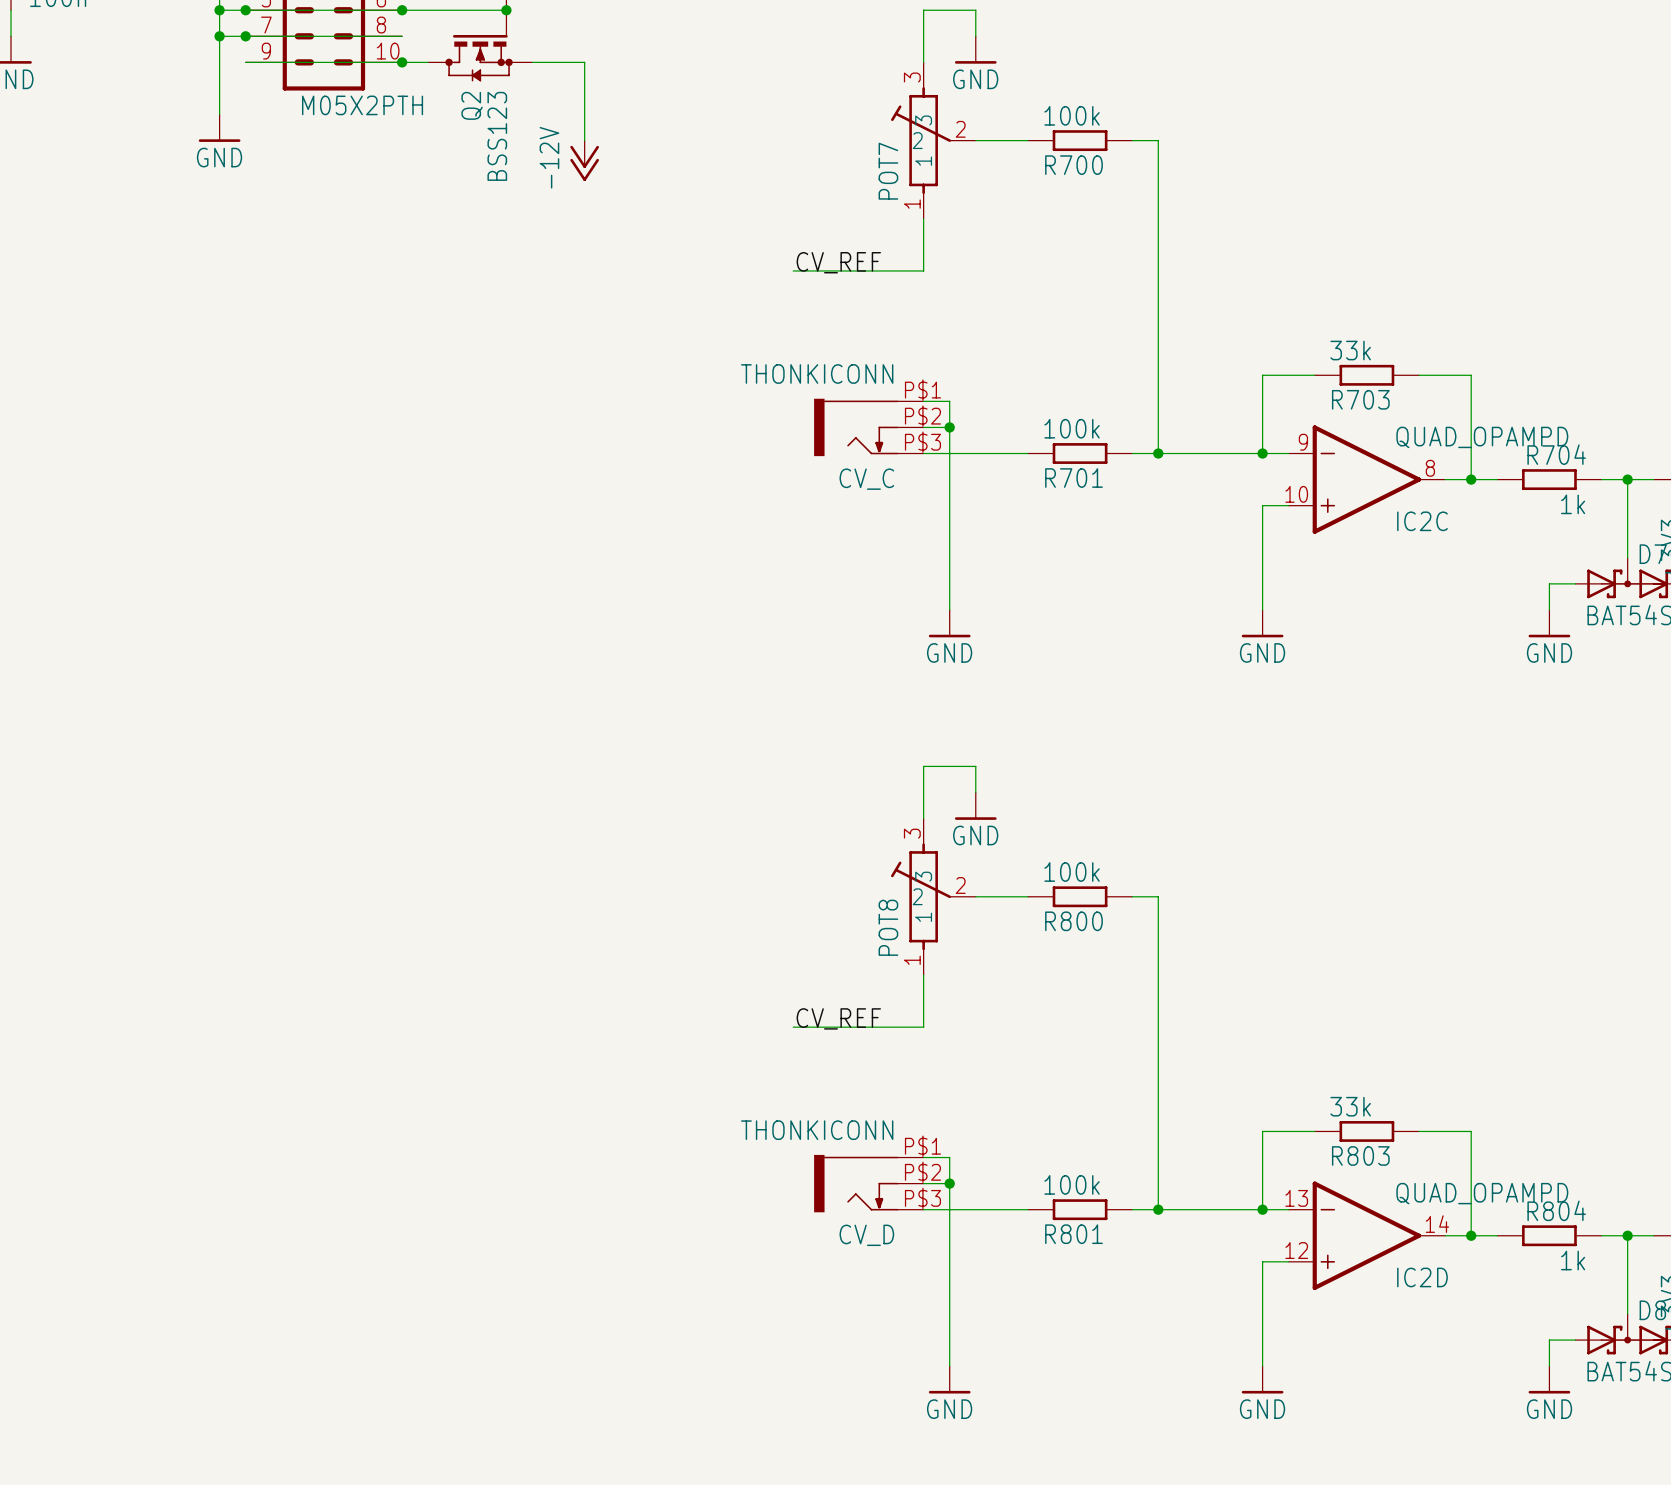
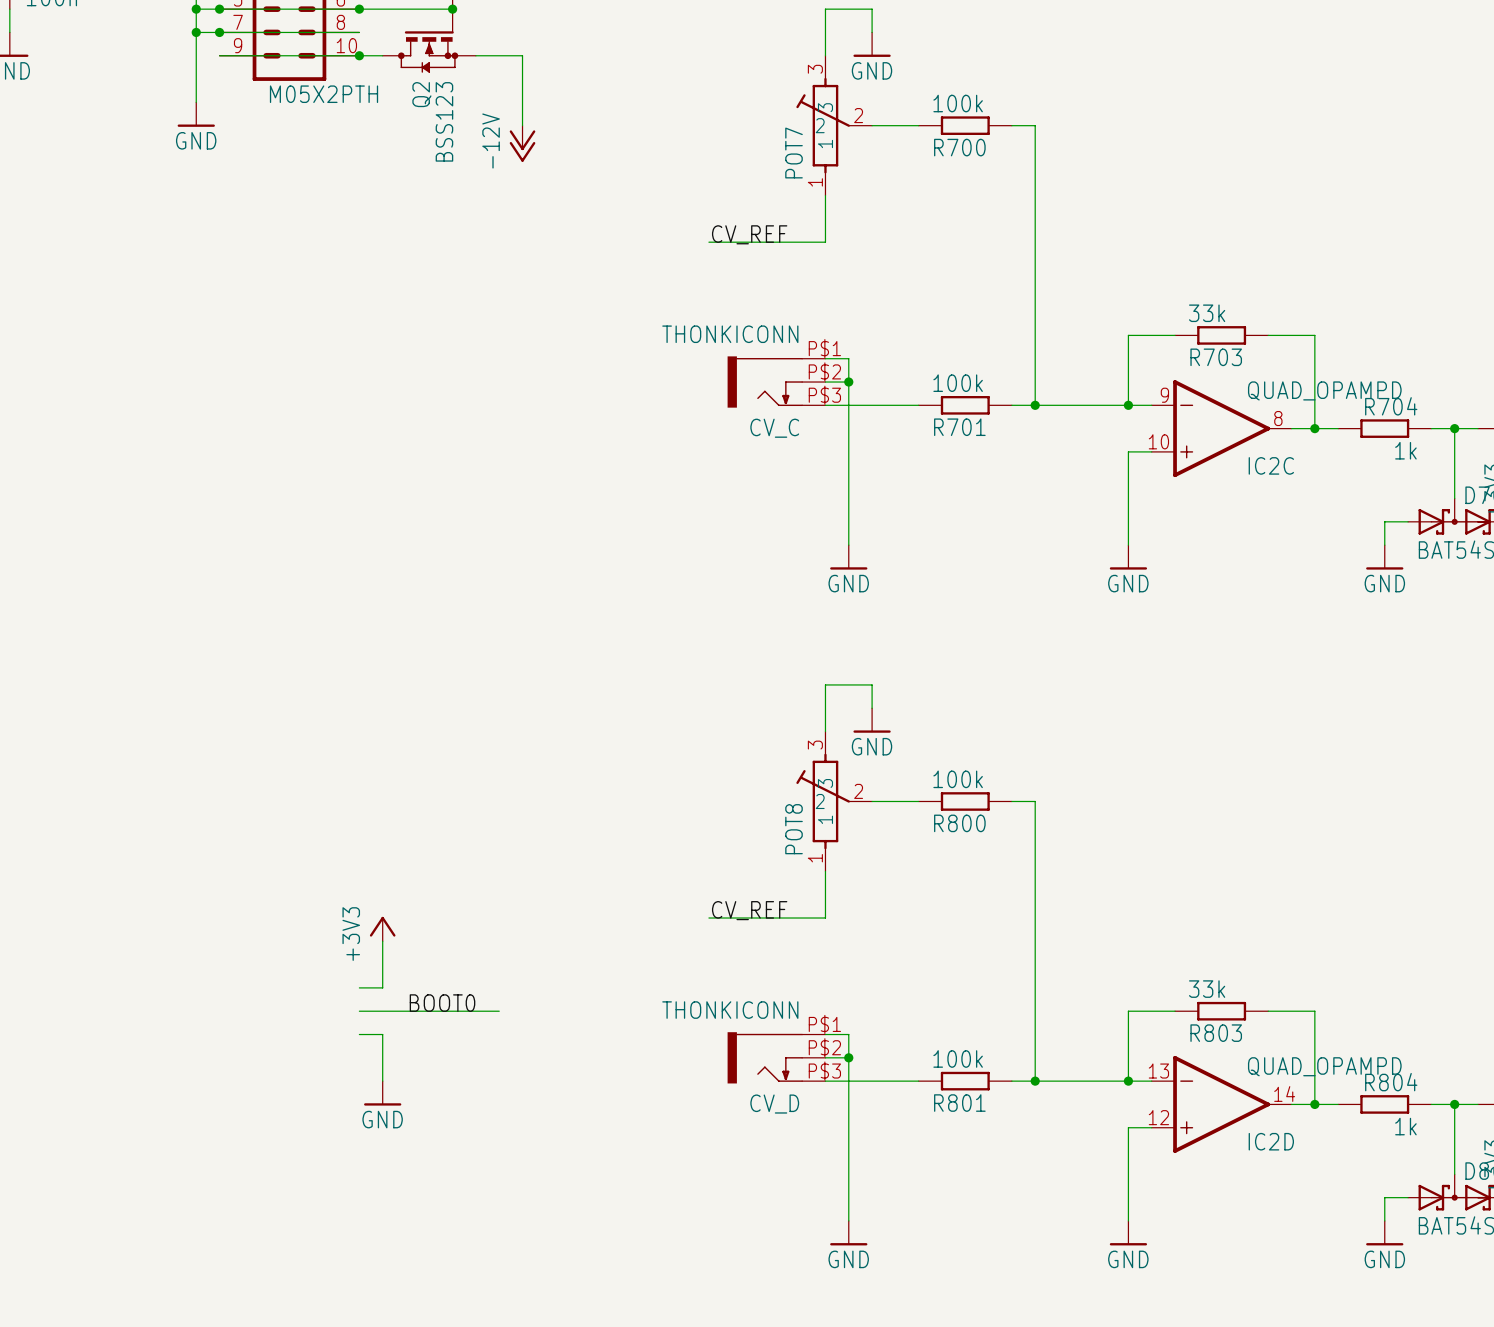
power symbol: none -> +3V3 (382, 929)
wire: none -> (382, 941) (382, 987) (359, 987)
label: none -> BOOT0 (442, 1003)
wire: none -> (359, 1011) (499, 1011)
wire: none -> (359, 1034) (382, 1034) (382, 1081)
power symbol: none -> GND (382, 1093)

